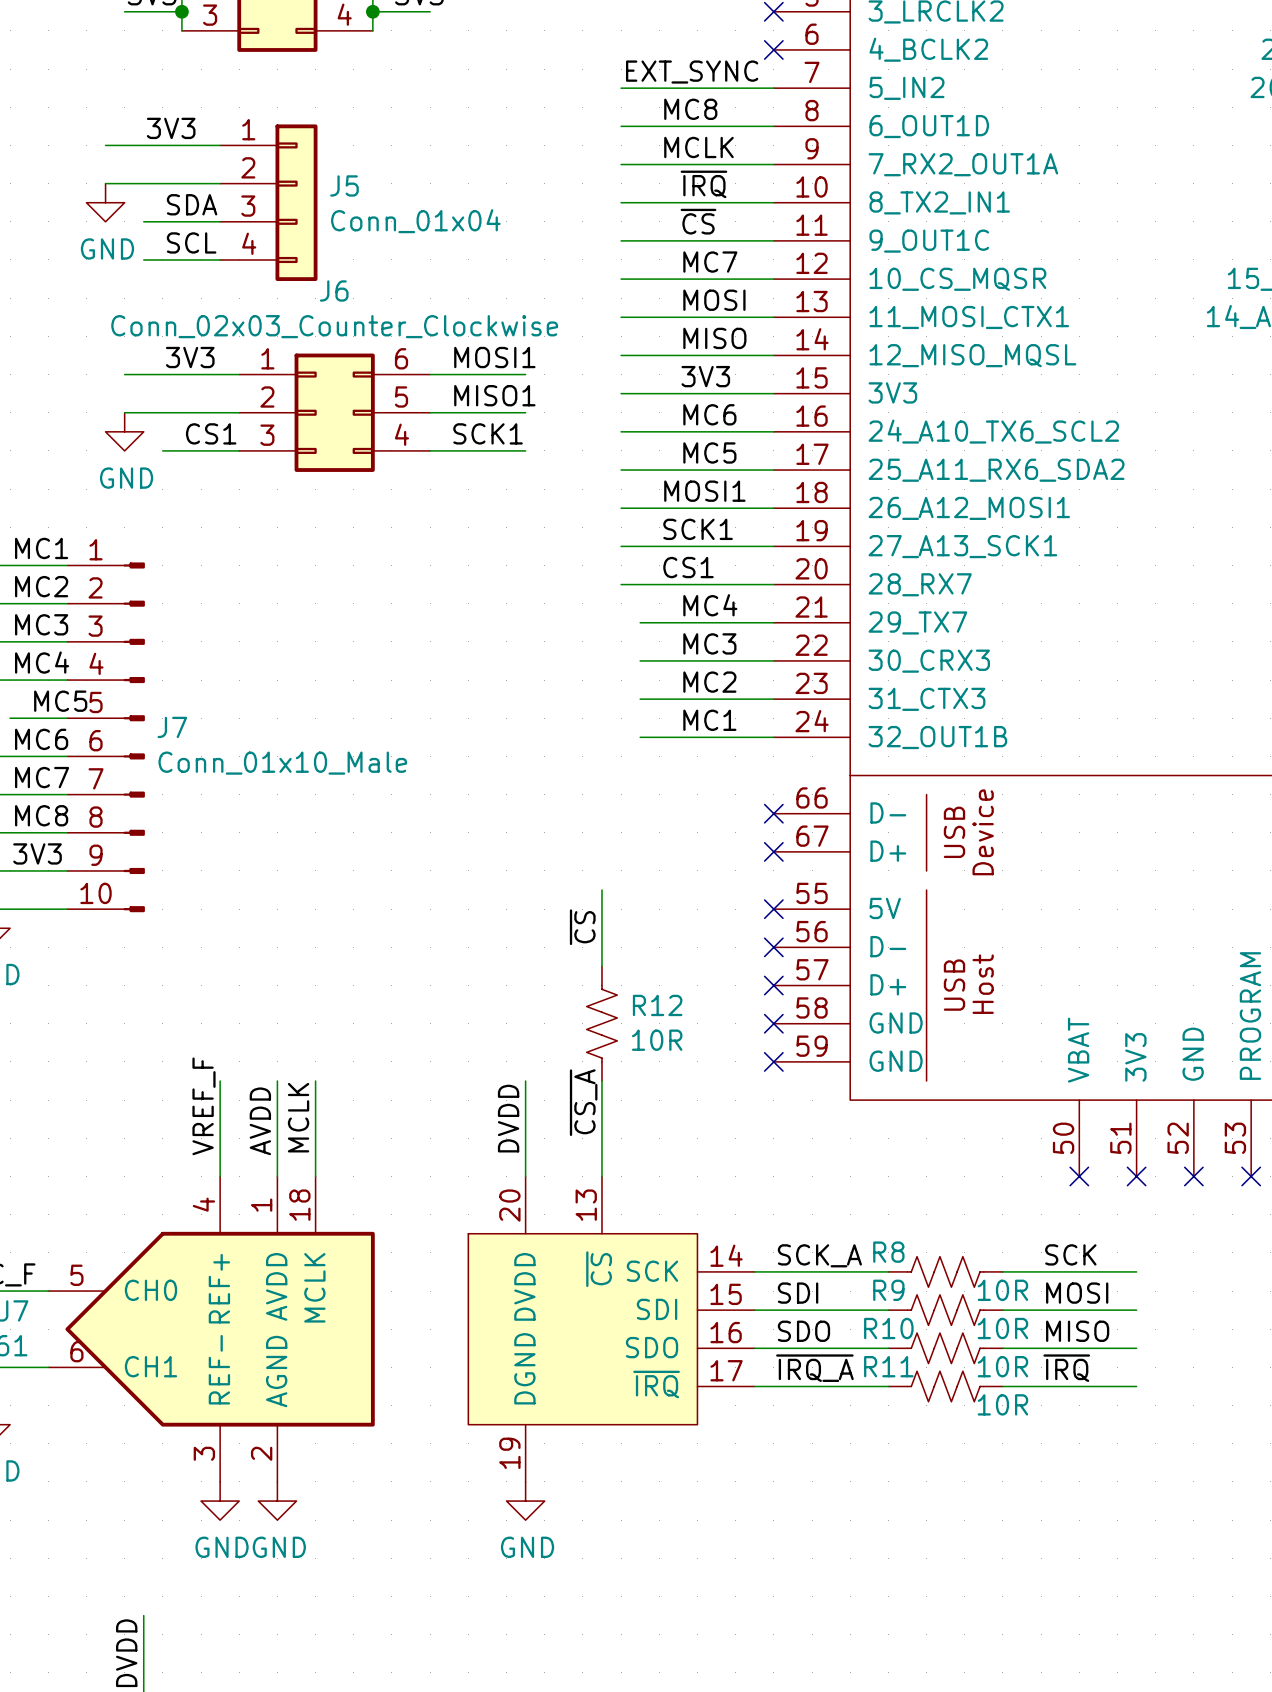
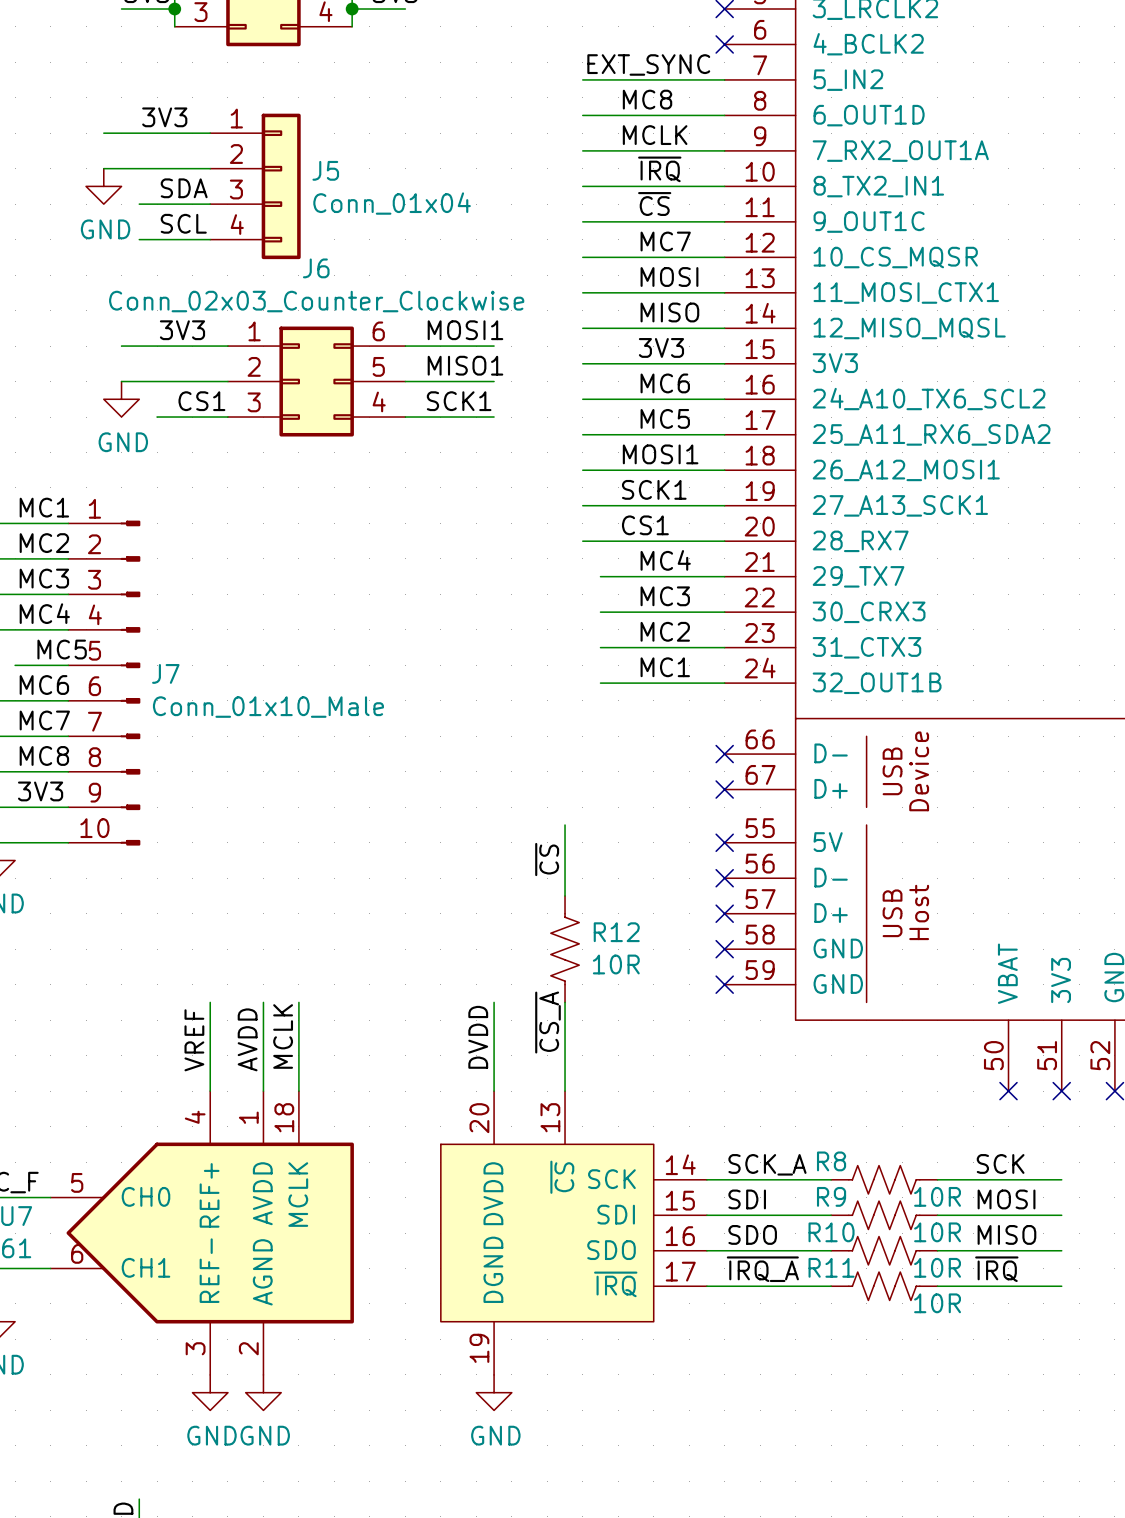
label: VREF_F (203, 1106) -> VREF (194, 1040)

